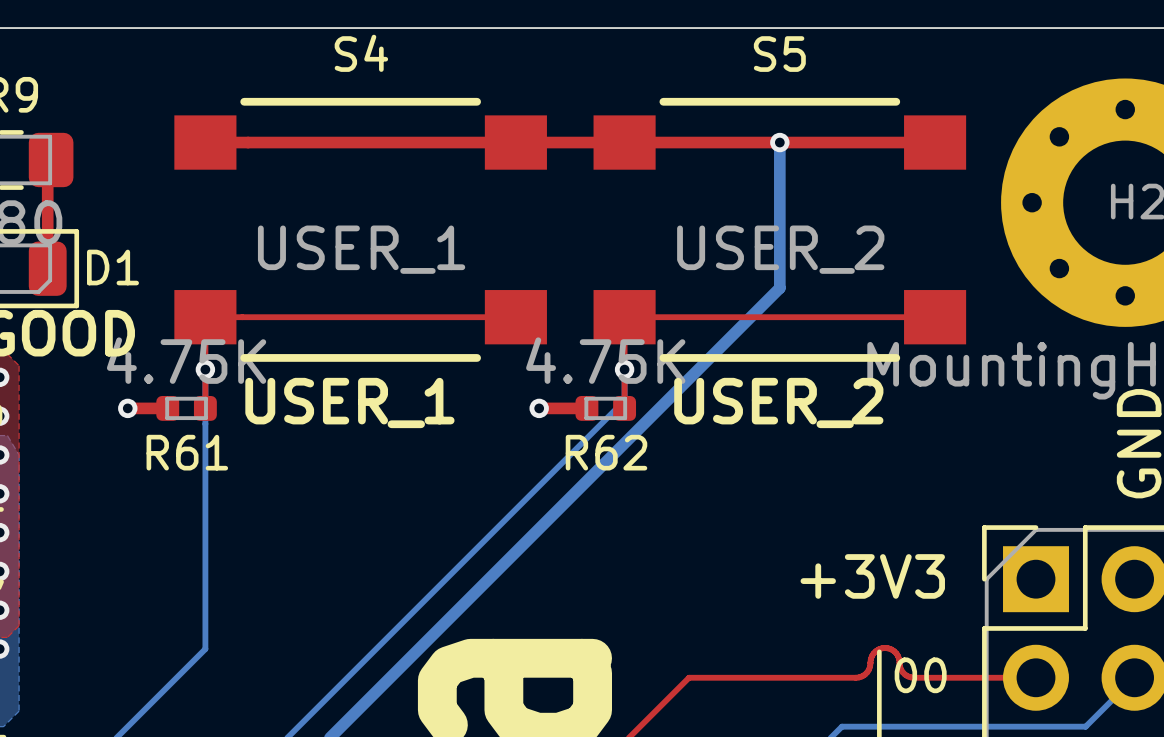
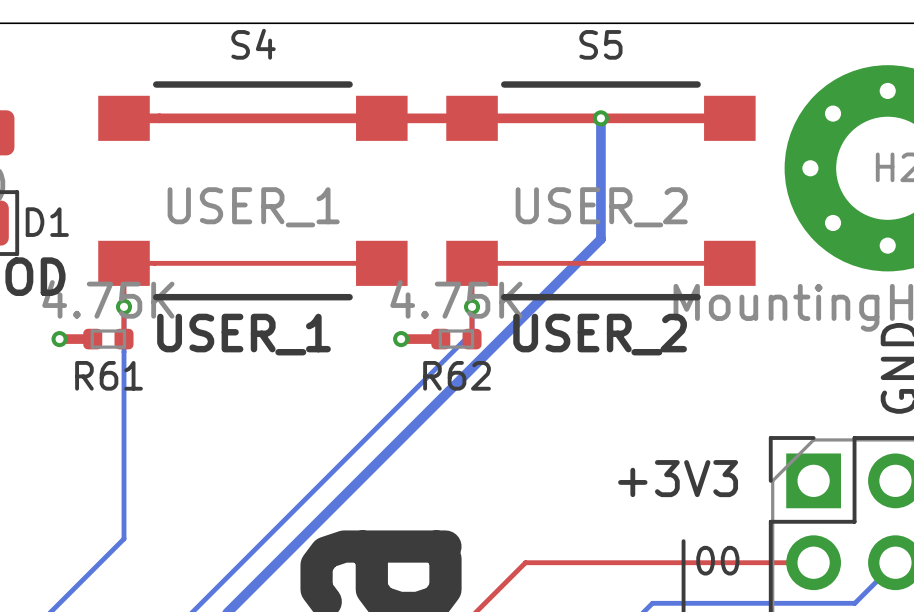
top track: (870, 662) (875, 651) (885, 647) (894, 651) (899, 662) -> none
top track: (870, 663) (864, 674) (855, 677) -> (712, 562) (664, 562)
top track: (899, 663) (905, 674) (914, 677) -> none

